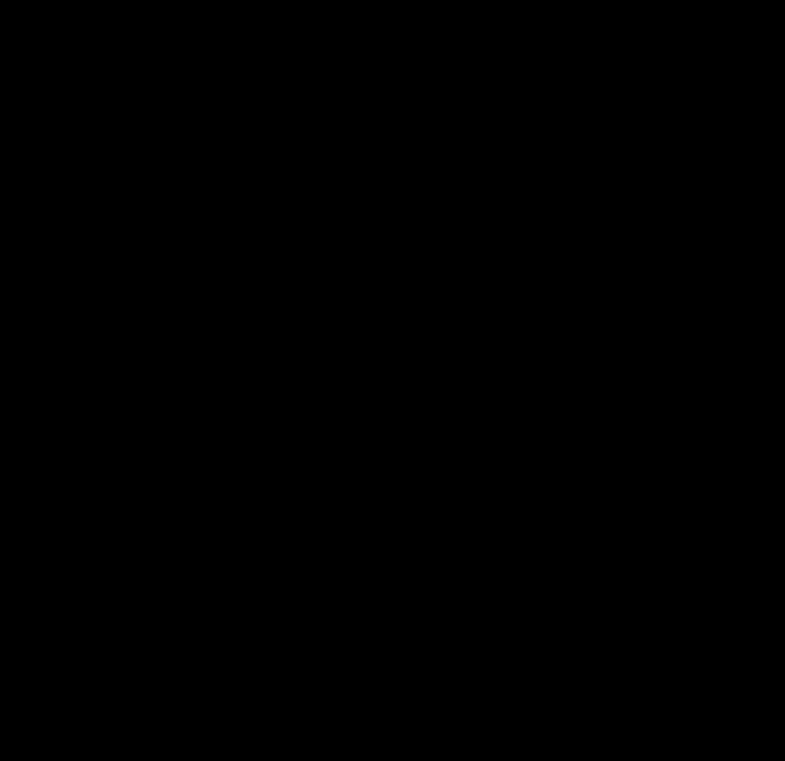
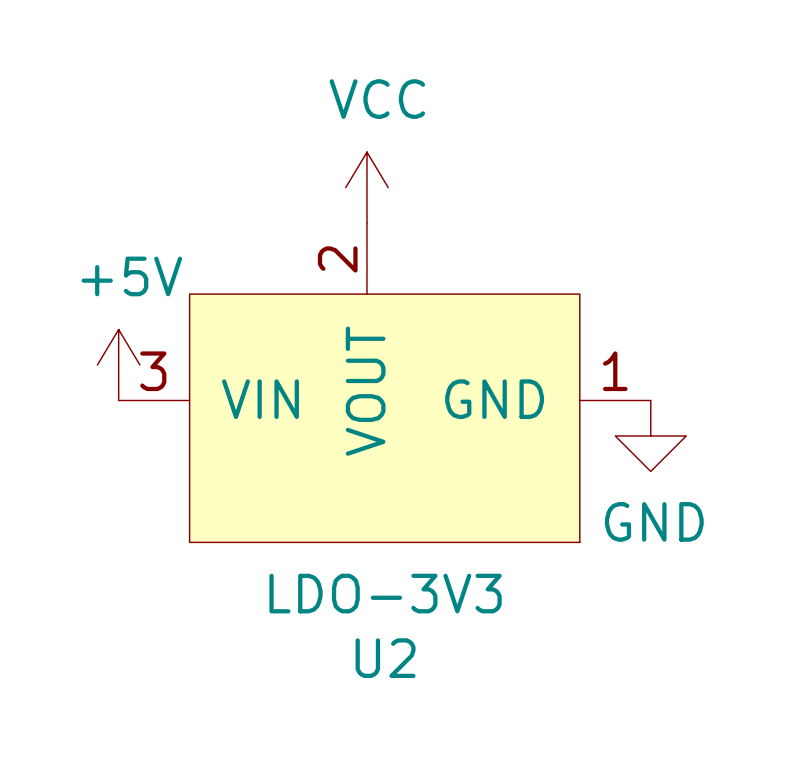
power symbol: none -> VCC (366, 187)
power symbol: none -> +5V (118, 365)
U2: none -> LDO-3V3 (384, 382)
power symbol: none -> GND (650, 435)

